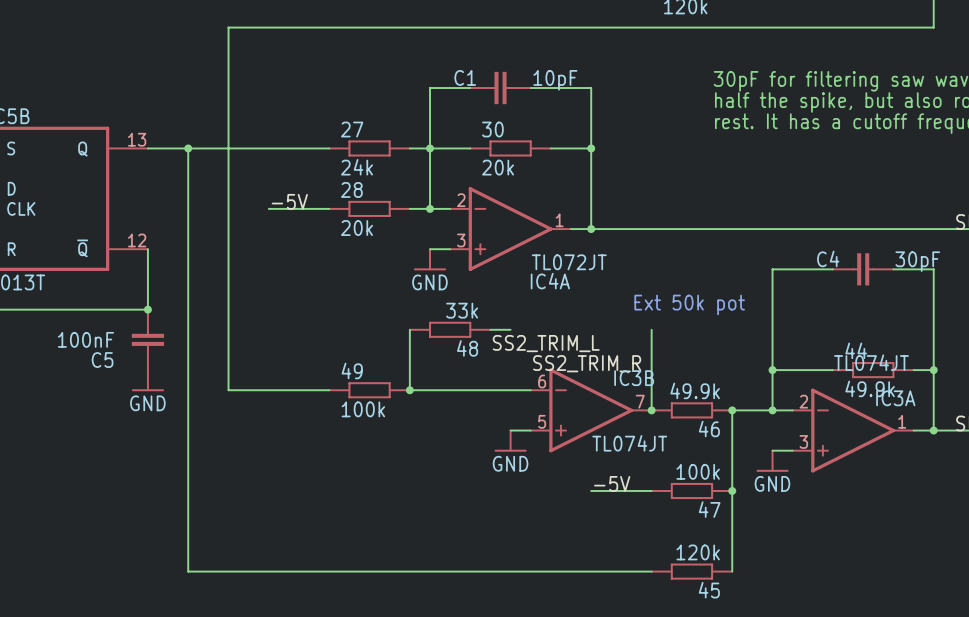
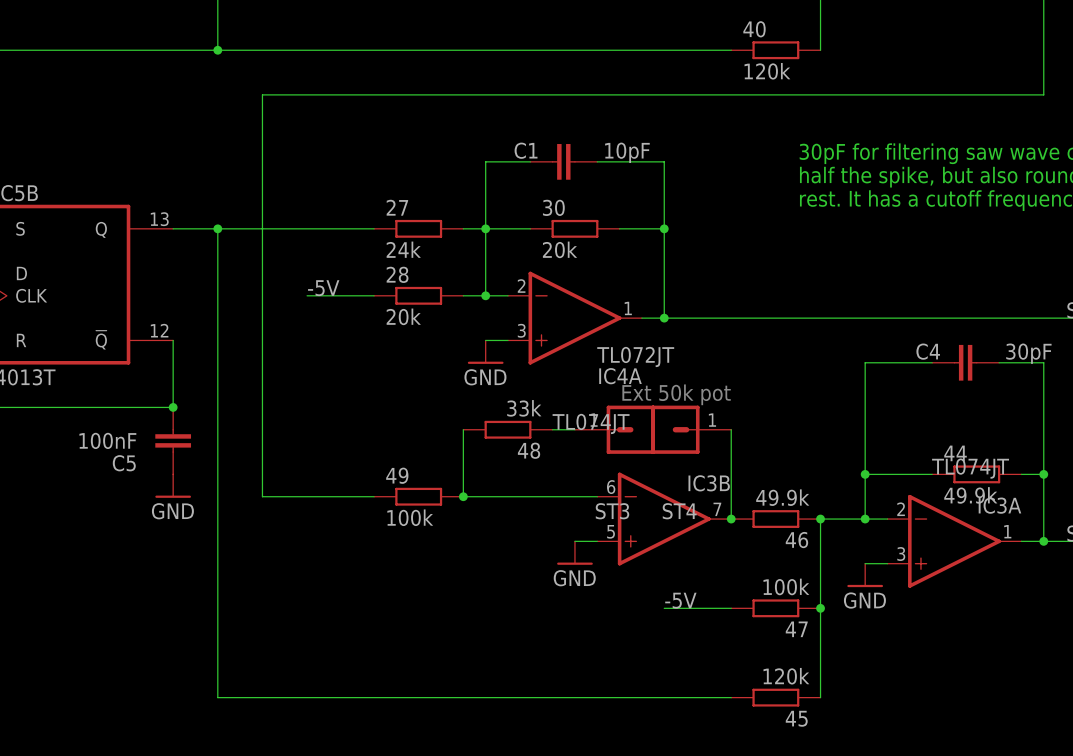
text position: Ext 50k pot (689, 304) -> Ext 50k pot (676, 394)
ST3: none -> (614, 429)
ST4: none -> (691, 429)
label: SS2_TRIM_L (546, 343) -> none
label: SS2_TRIM_R (587, 363) -> none
IC3B value position: TL074JT (629, 443) -> TL074JT (591, 423)

